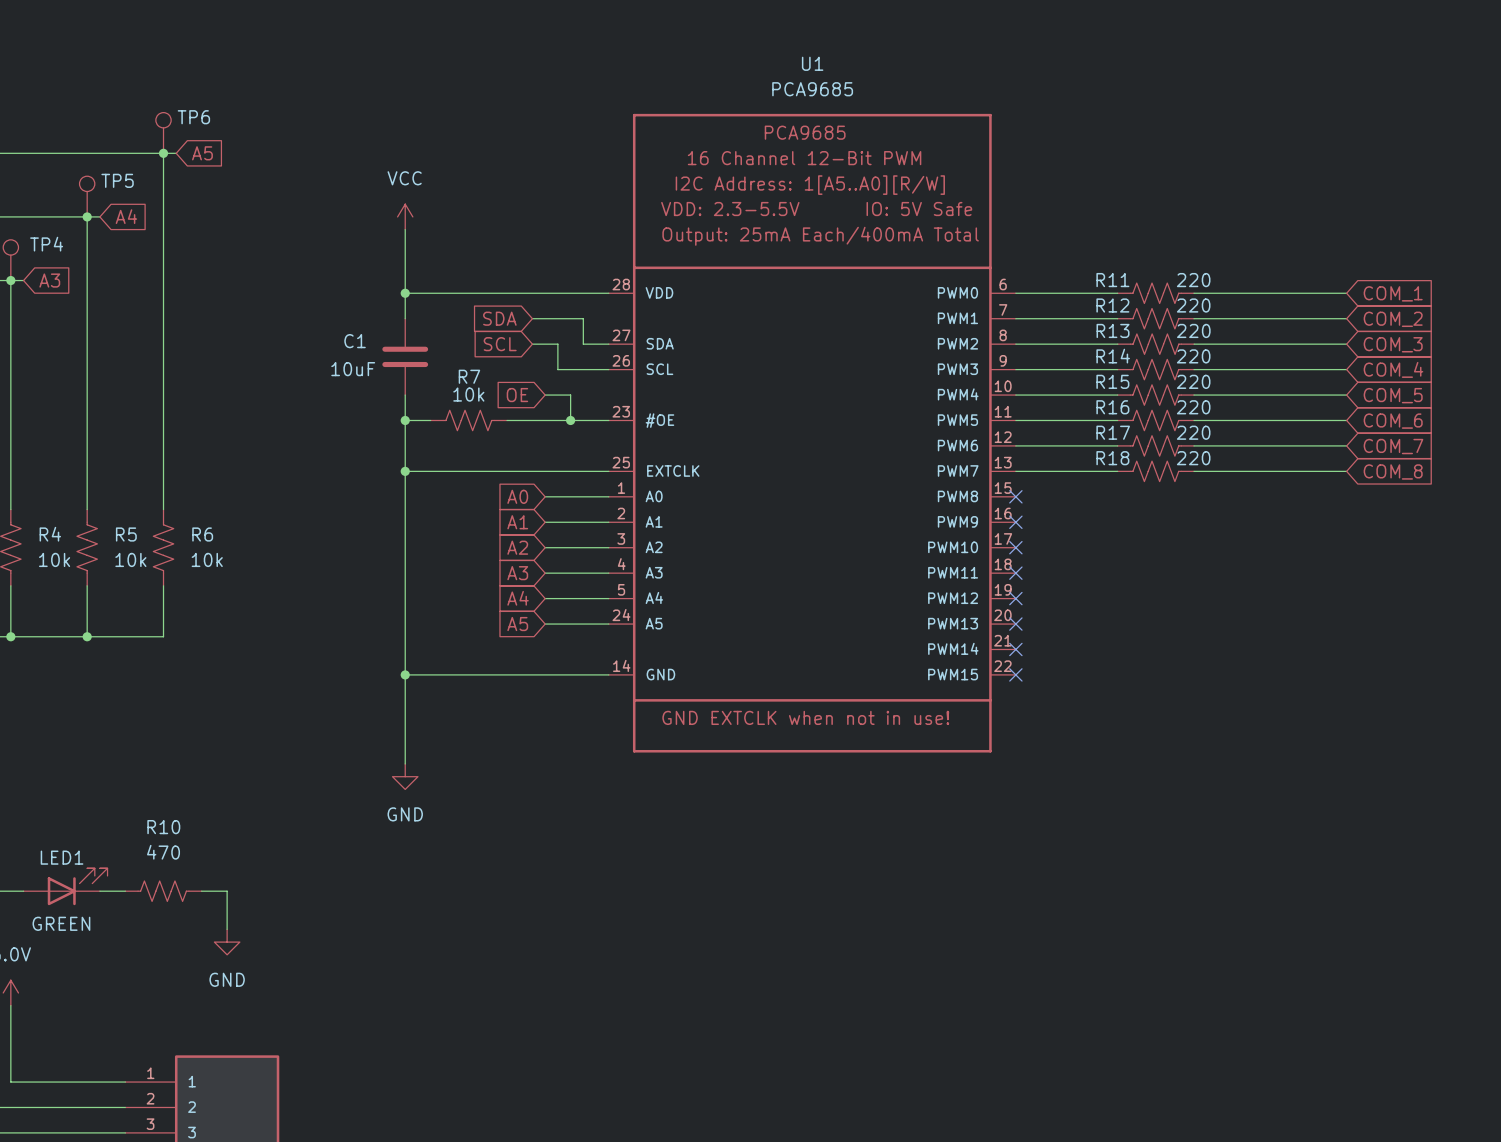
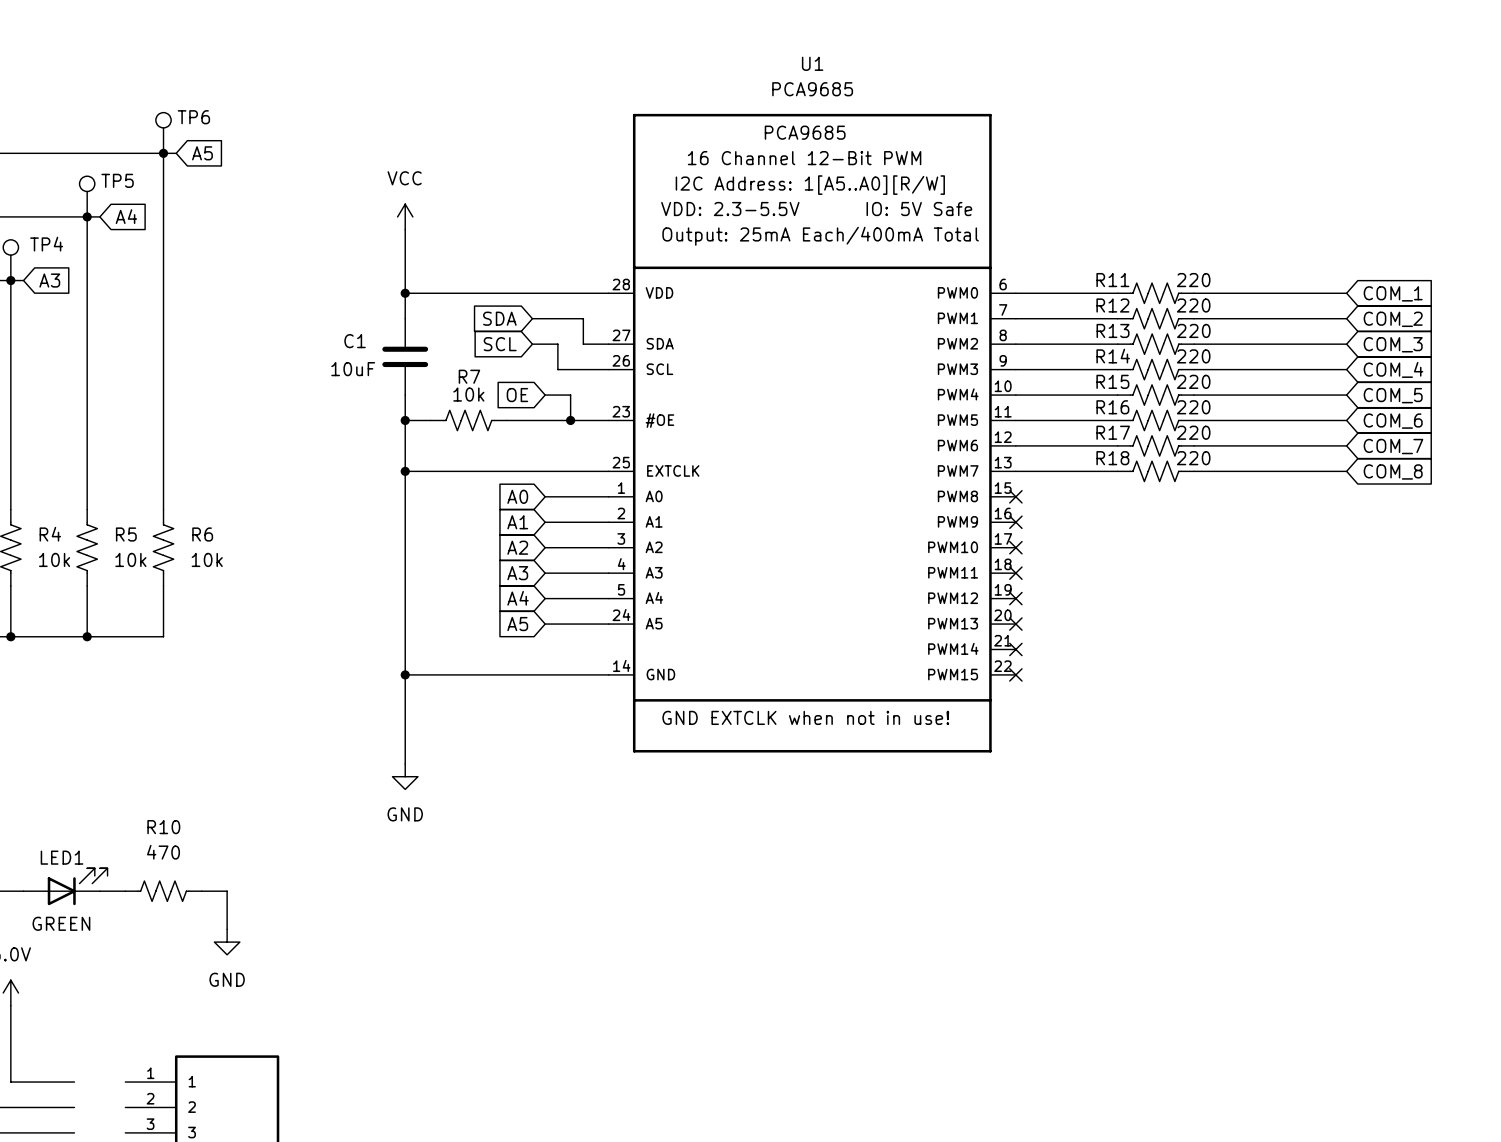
wire: (74, 1082) (125, 1082) -> none
wire: (74, 1107) (125, 1107) -> none
wire: (74, 1132) (125, 1132) -> none

